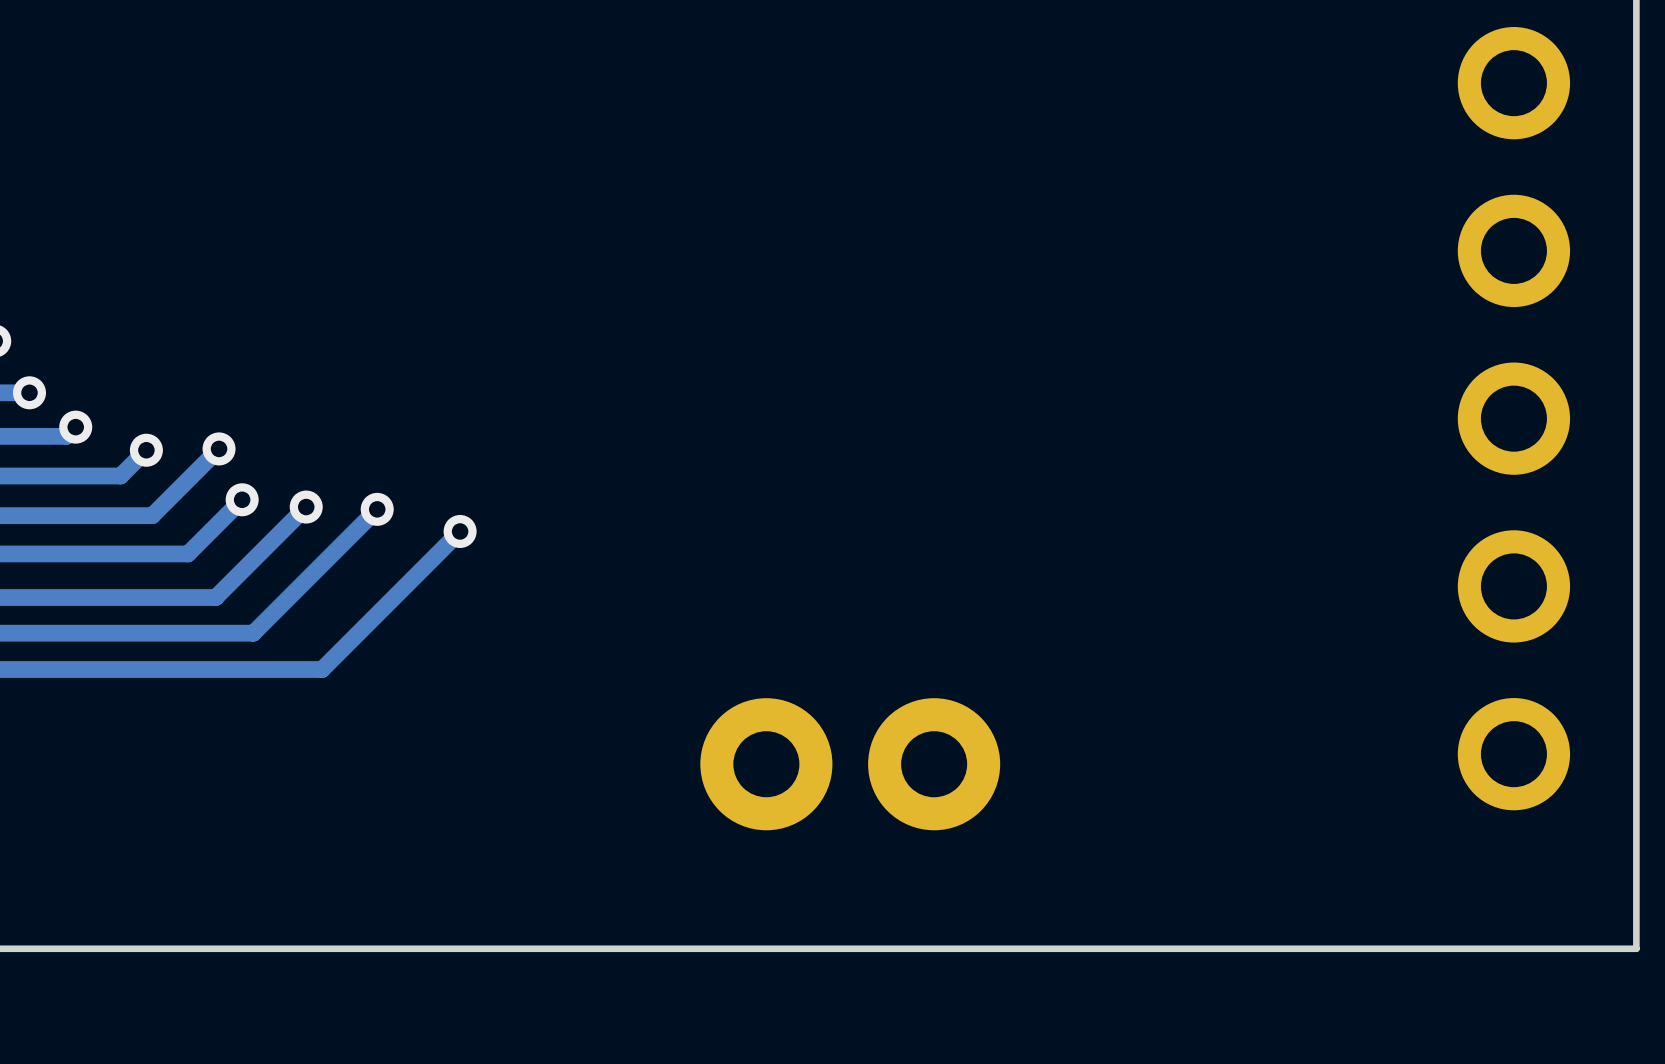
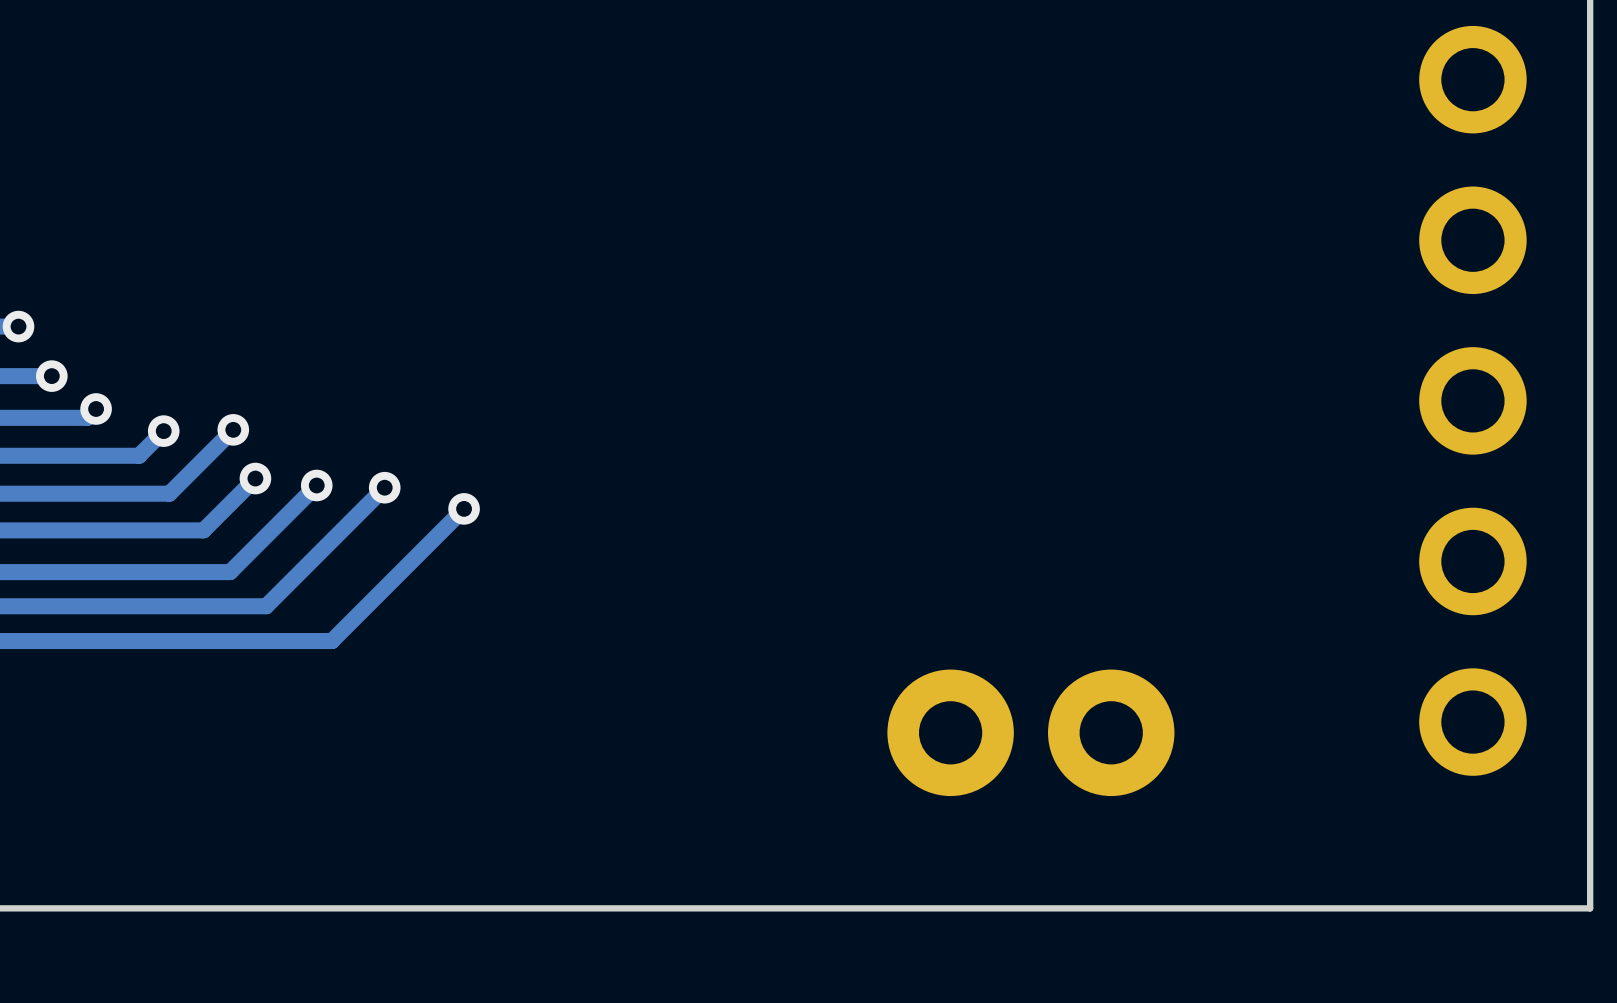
part position: (850, 764) -> (1030, 732)

